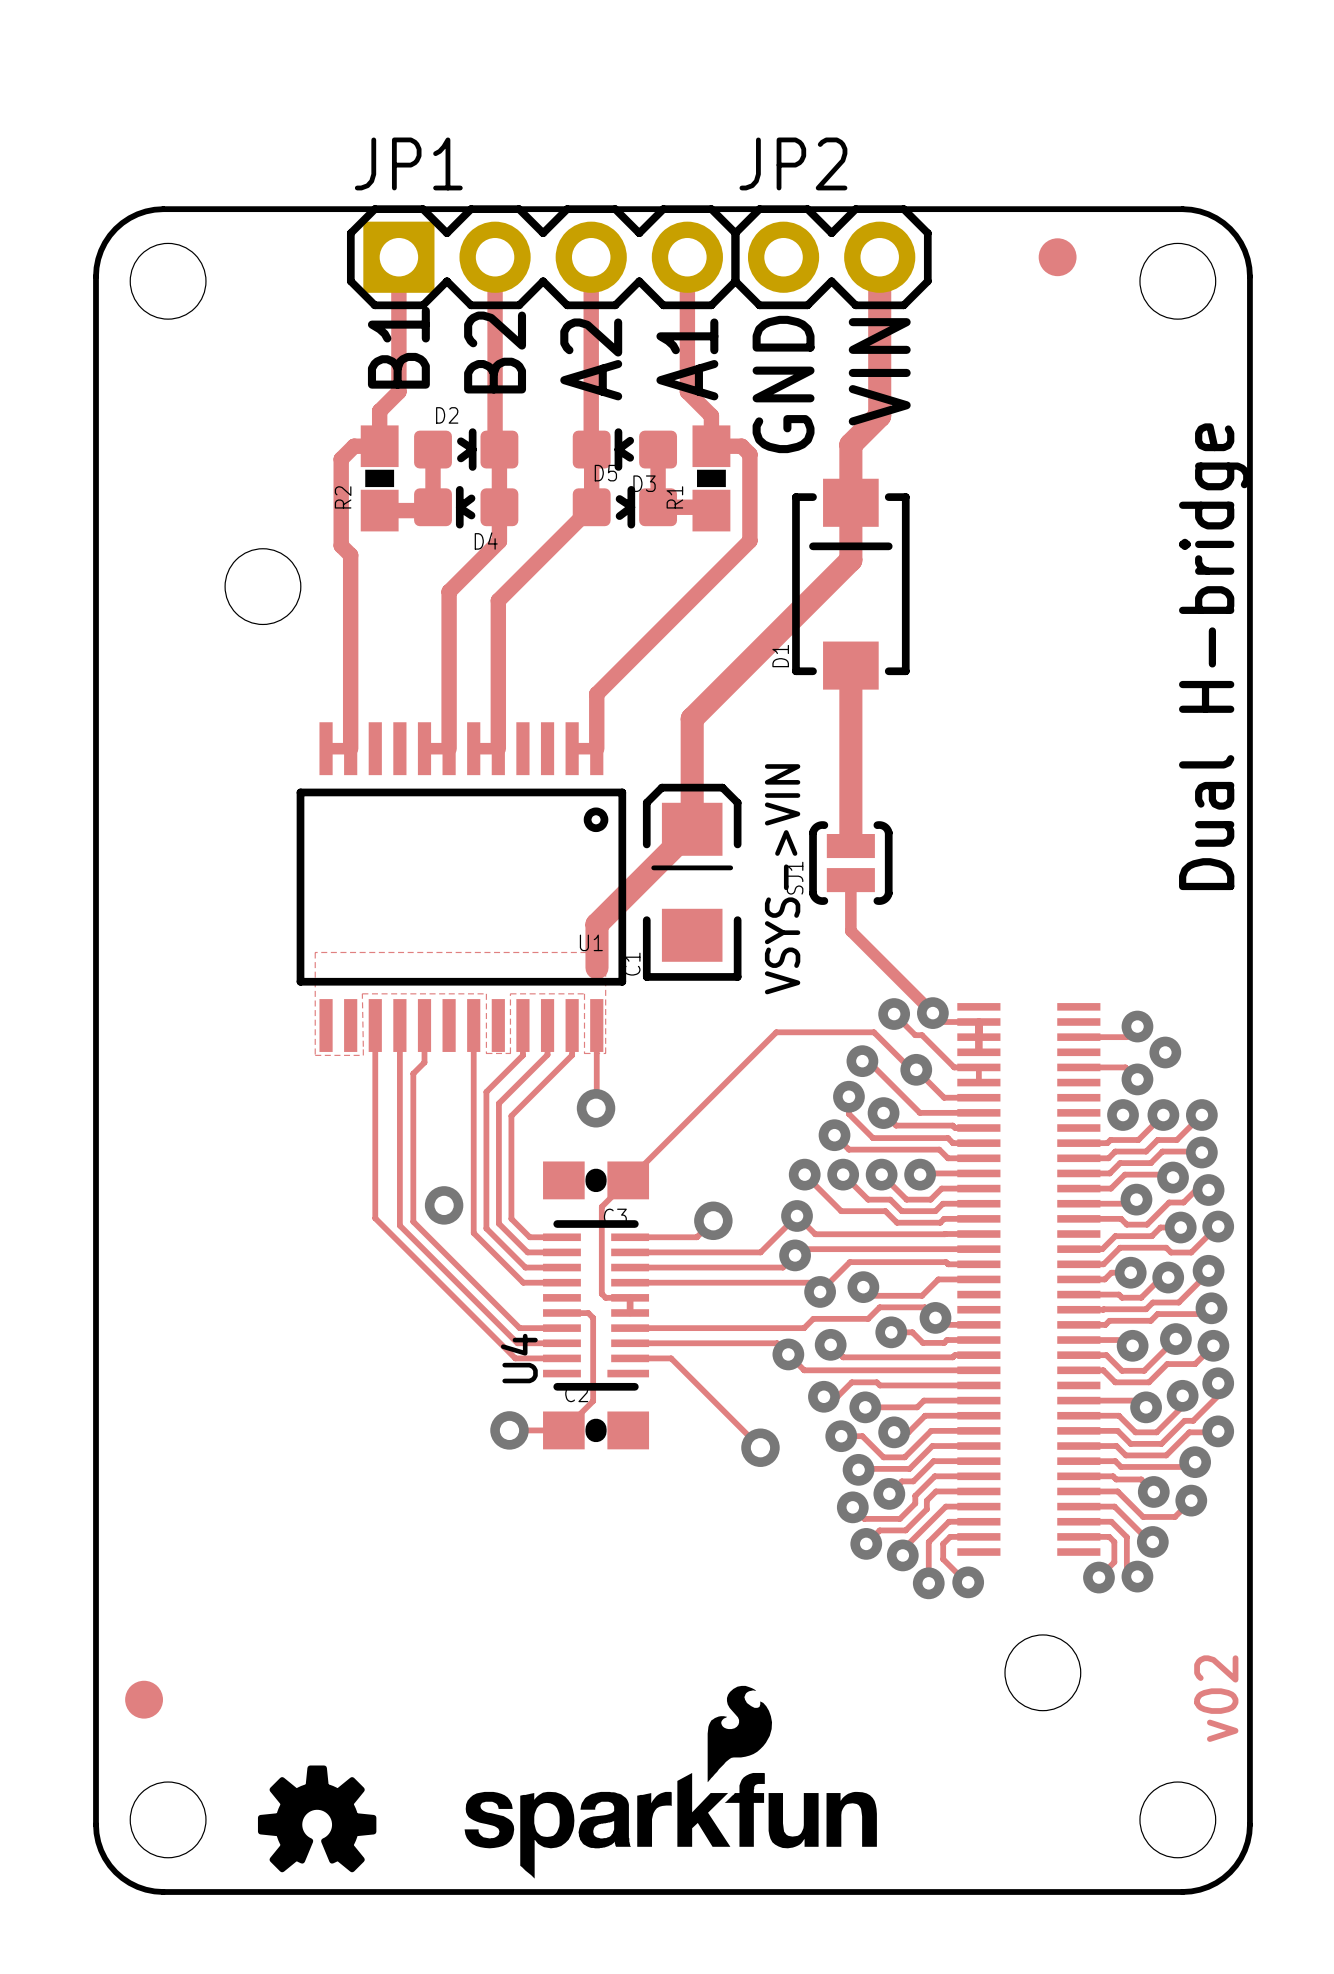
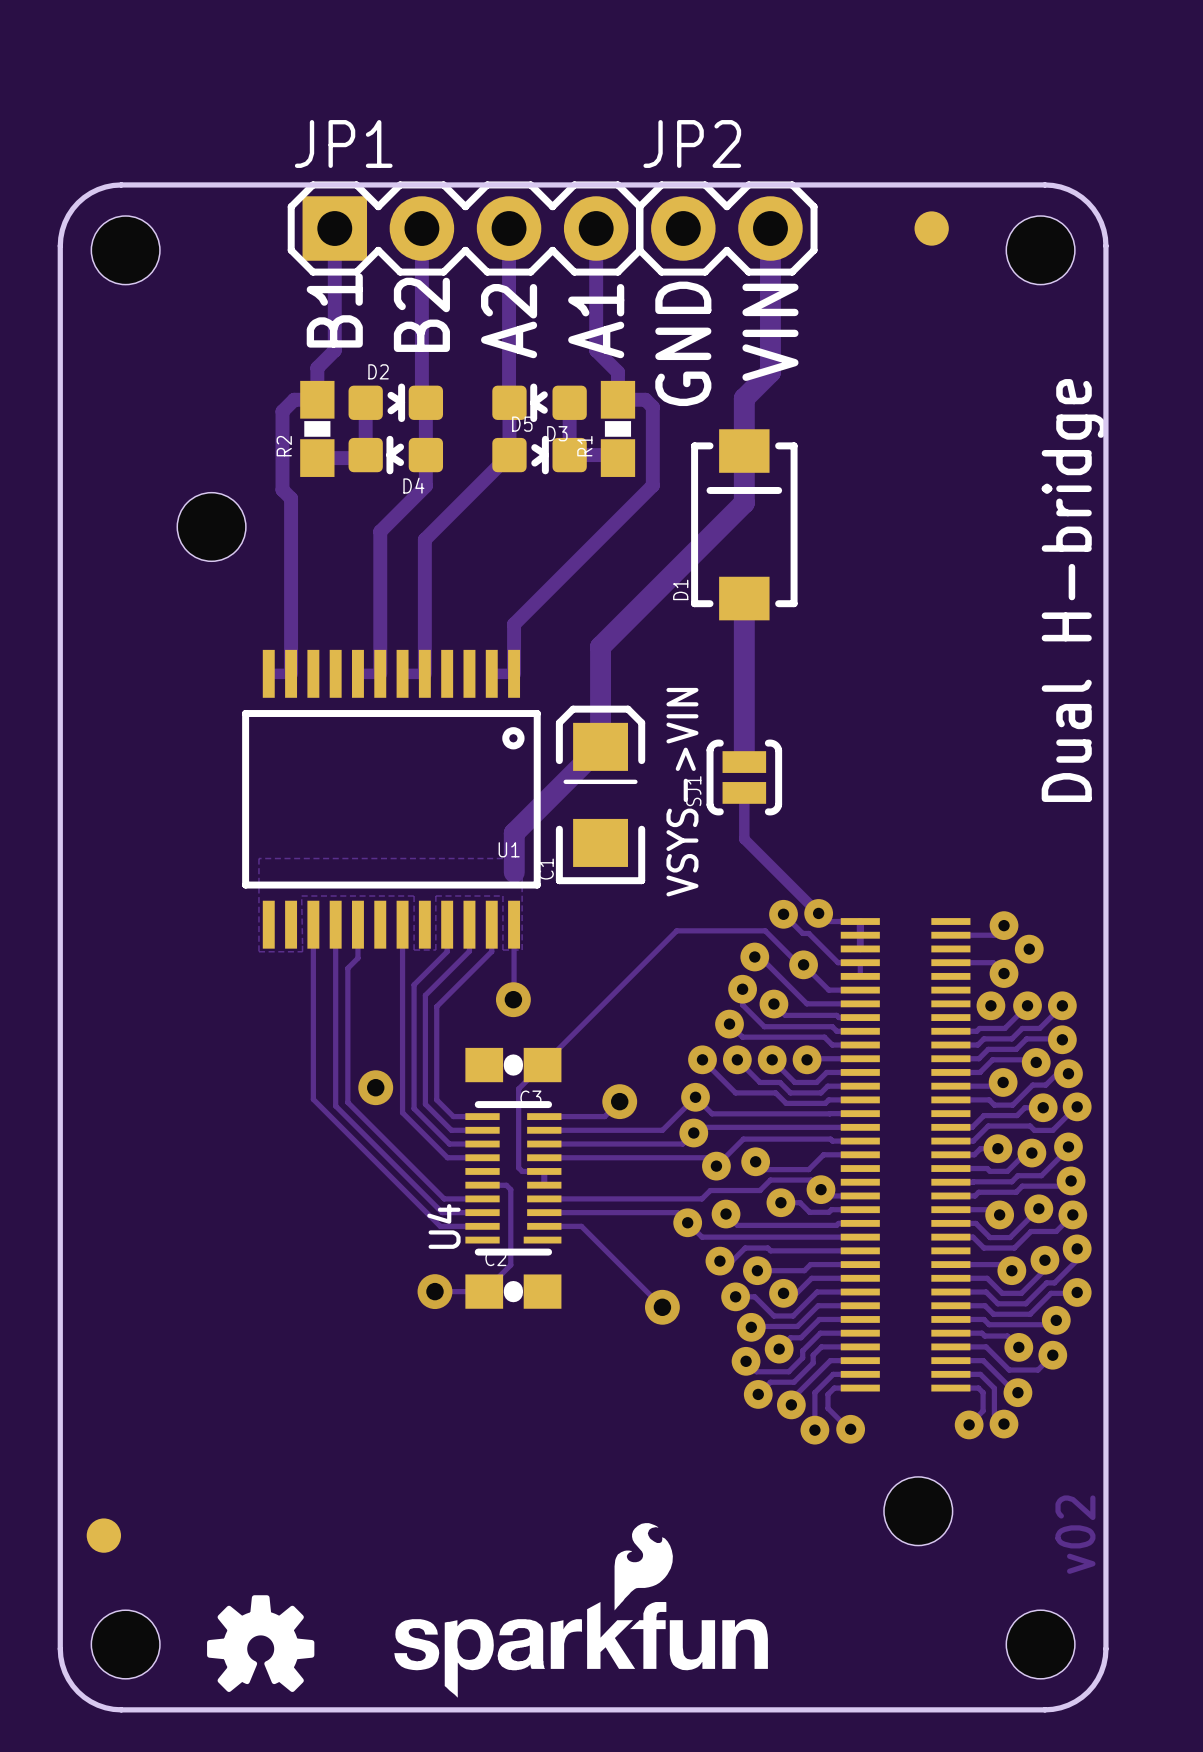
part footprint: [957, 1003, 1101, 1556] -> [840, 918, 971, 1392]

